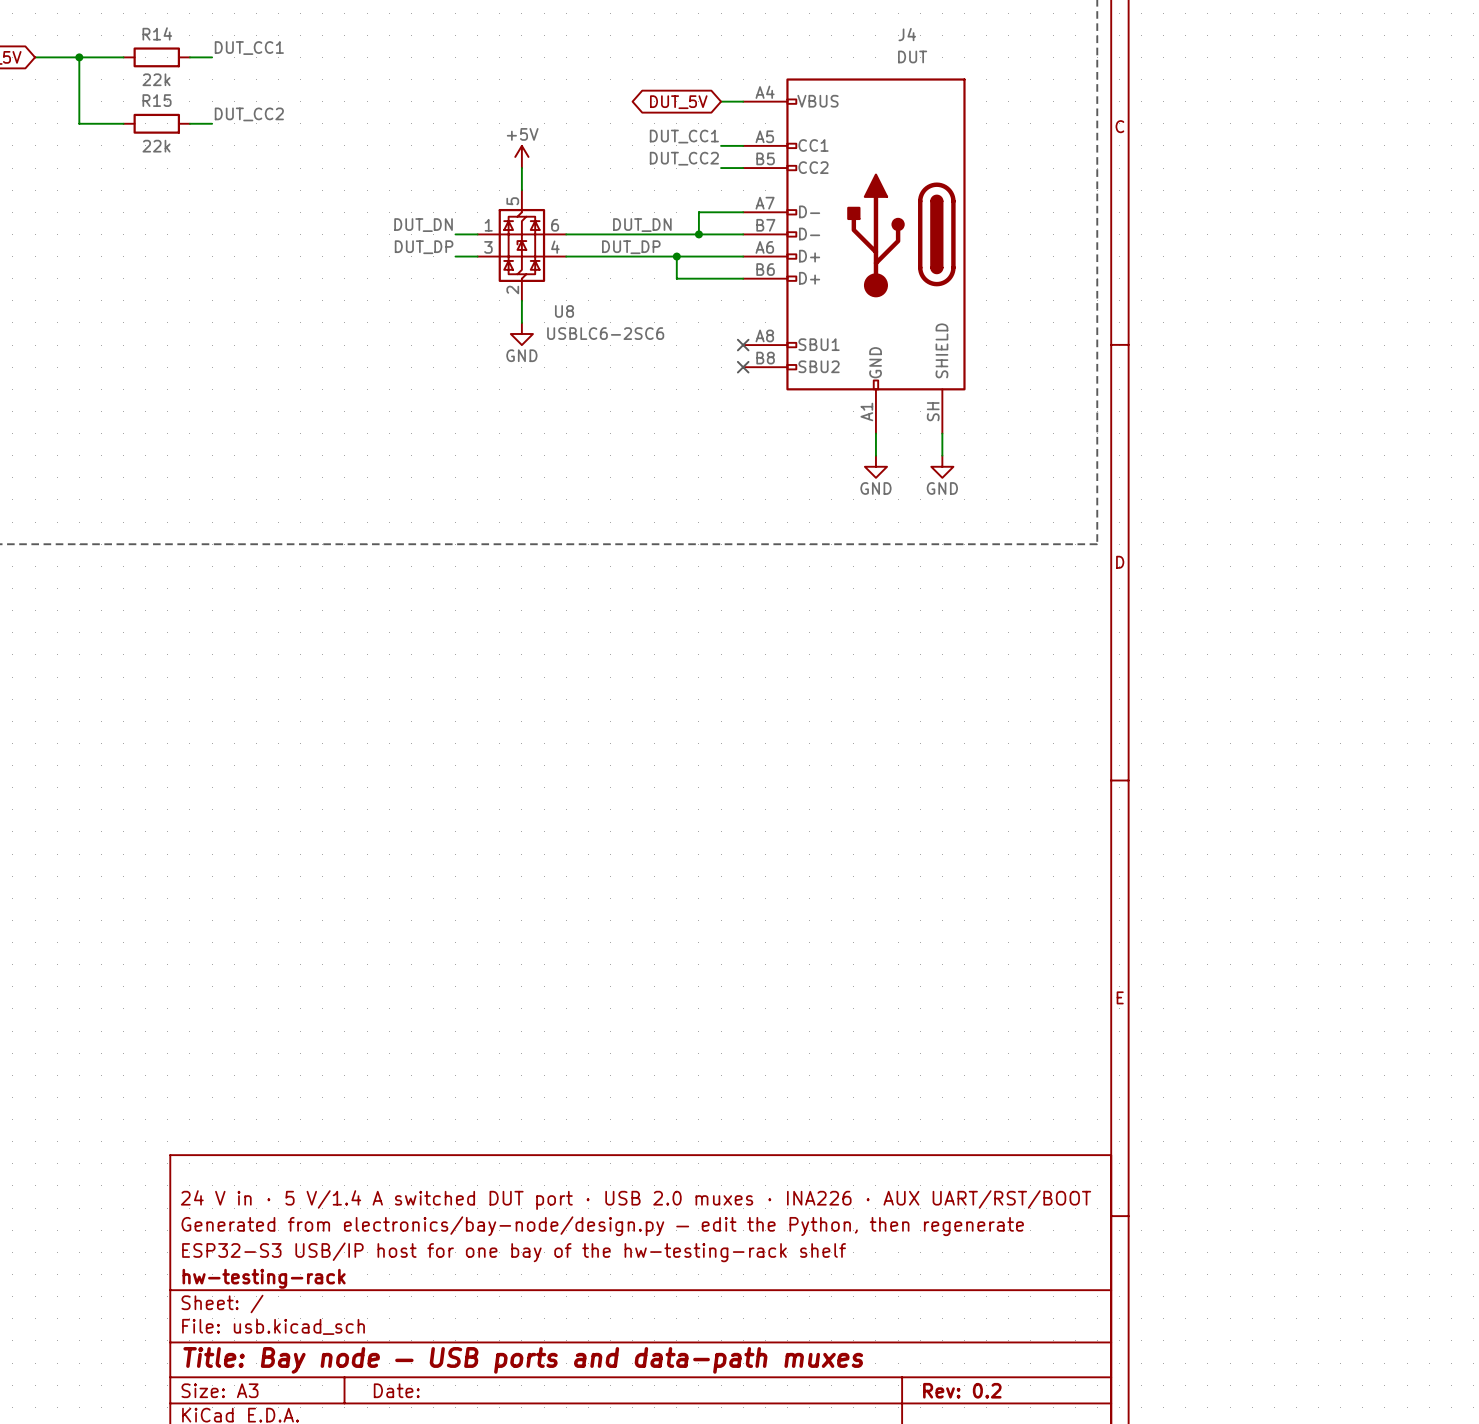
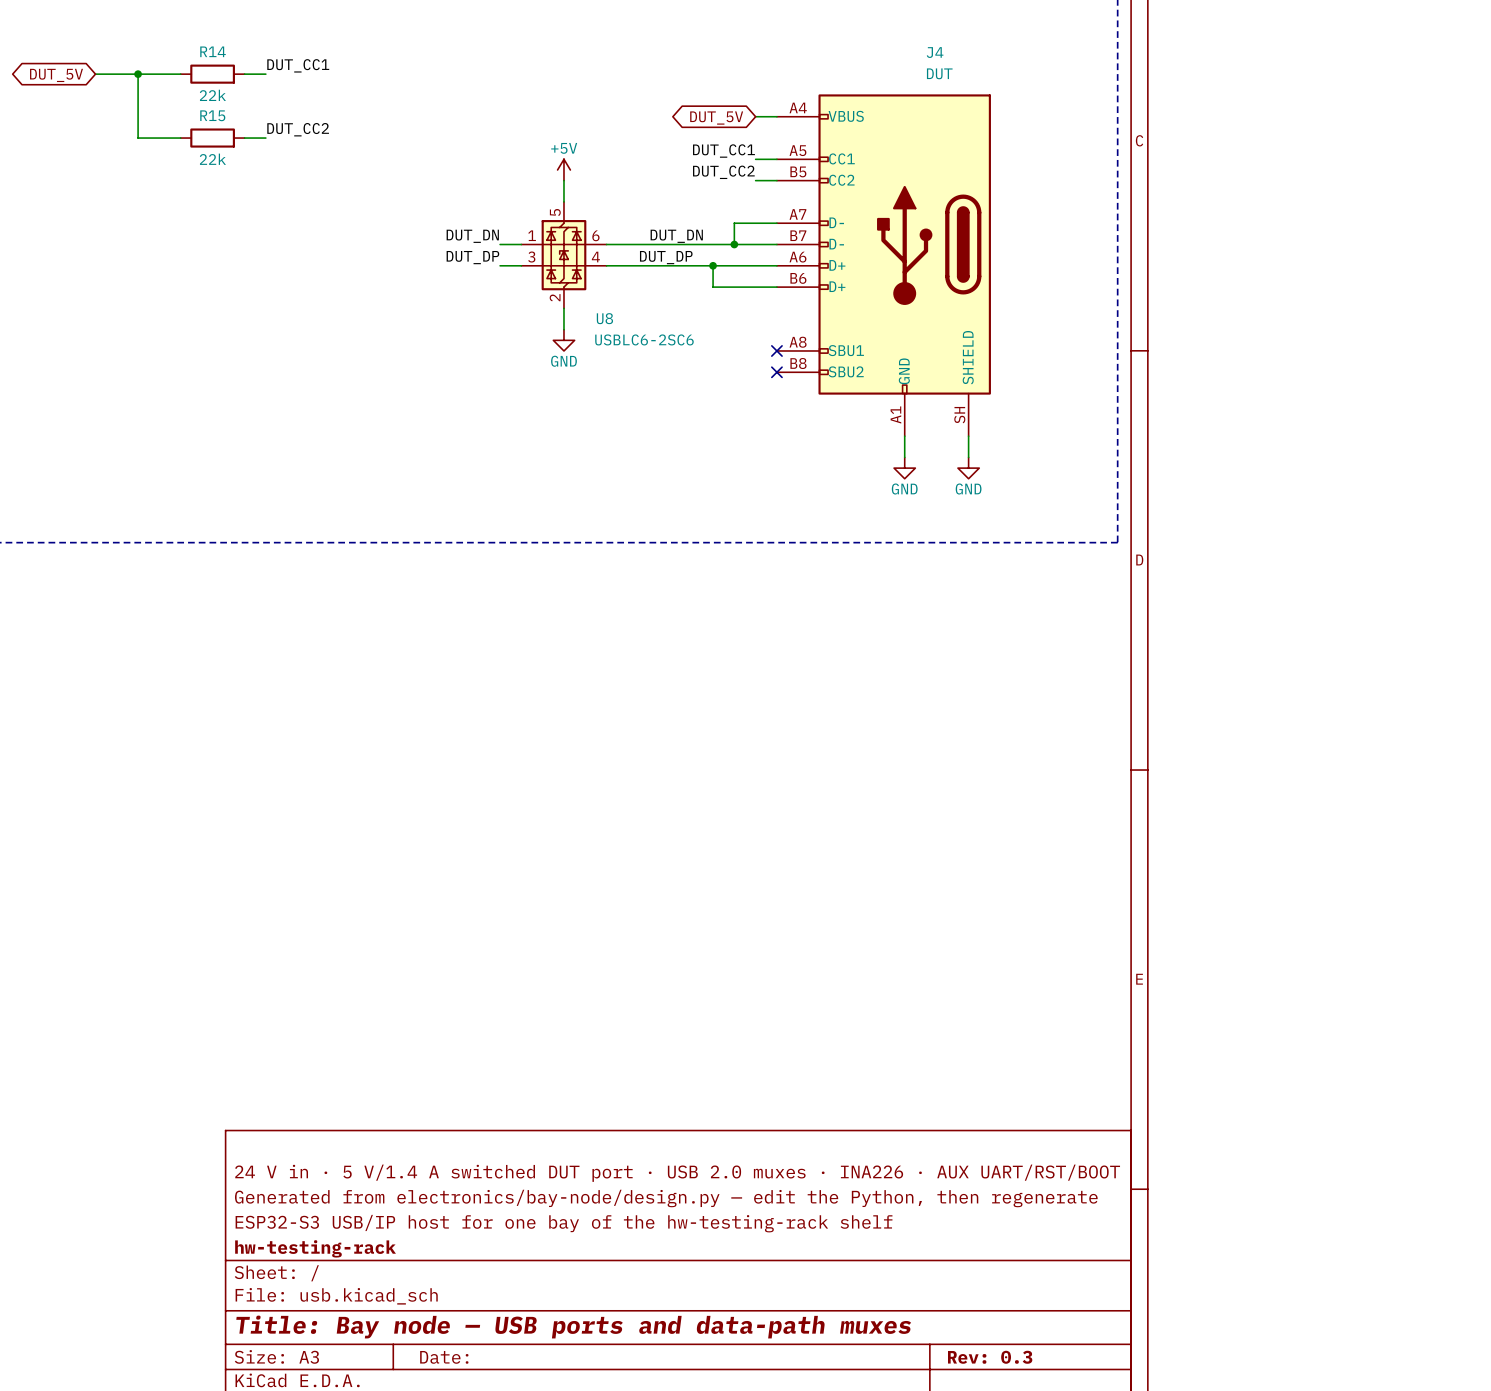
title block: Rev: 0.2 (962, 1390) -> Rev: 0.3 (990, 1357)

